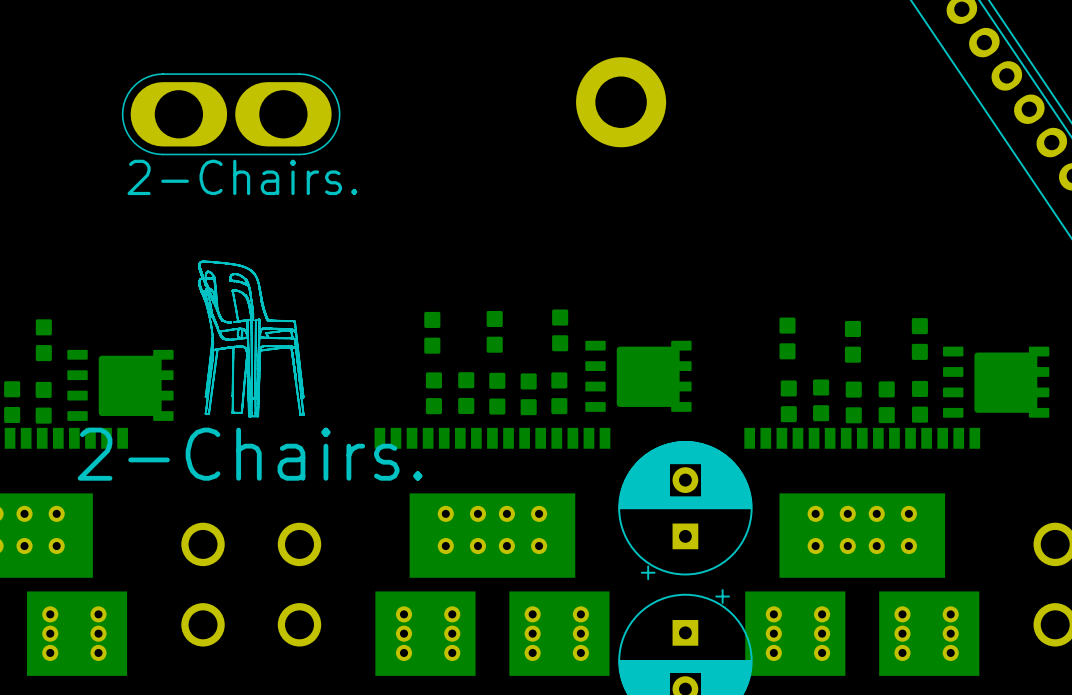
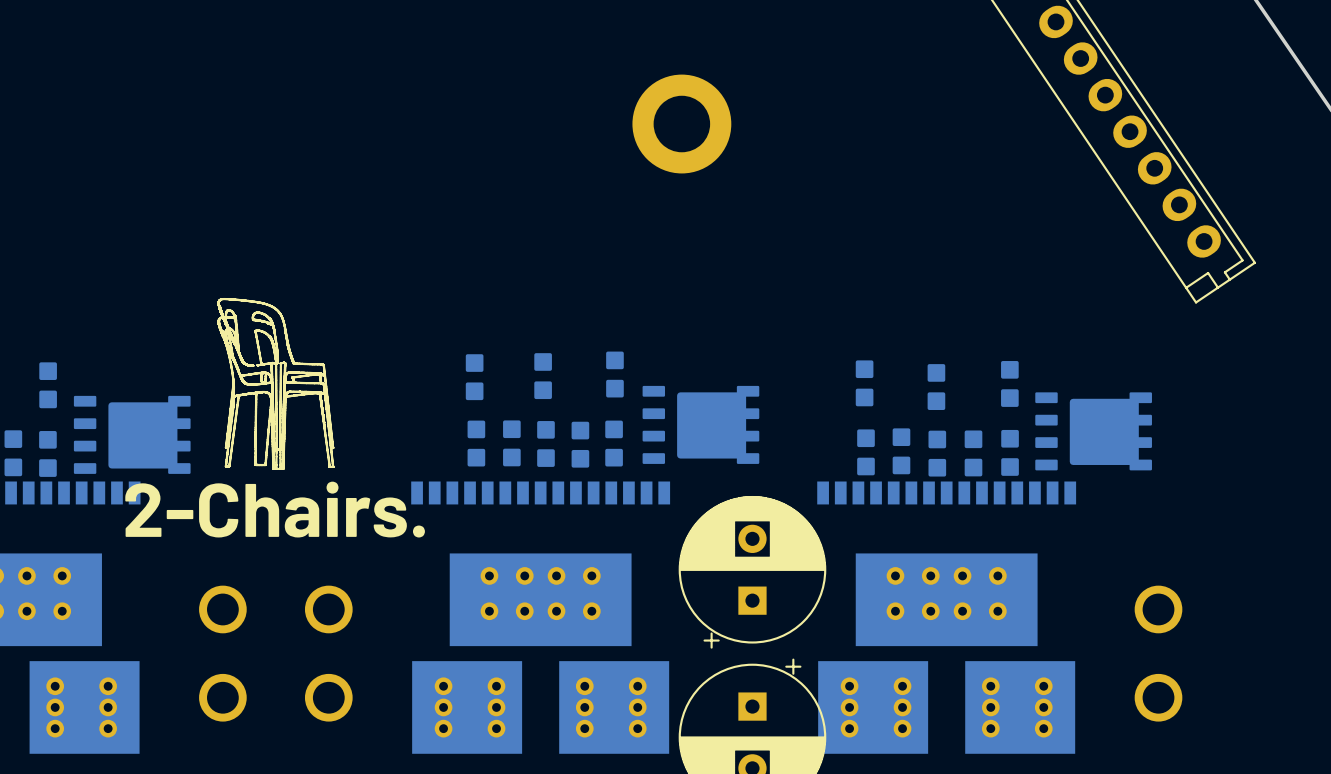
part: (231, 114) -> none

